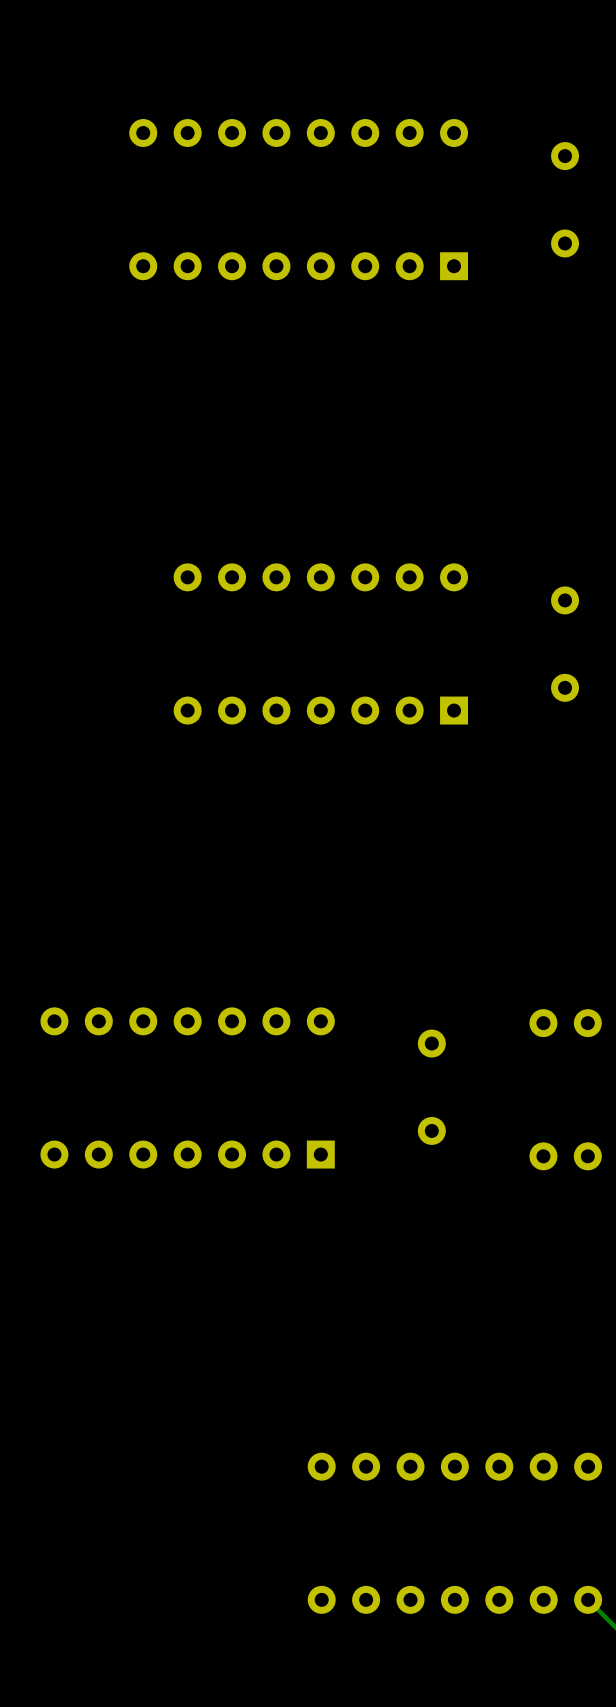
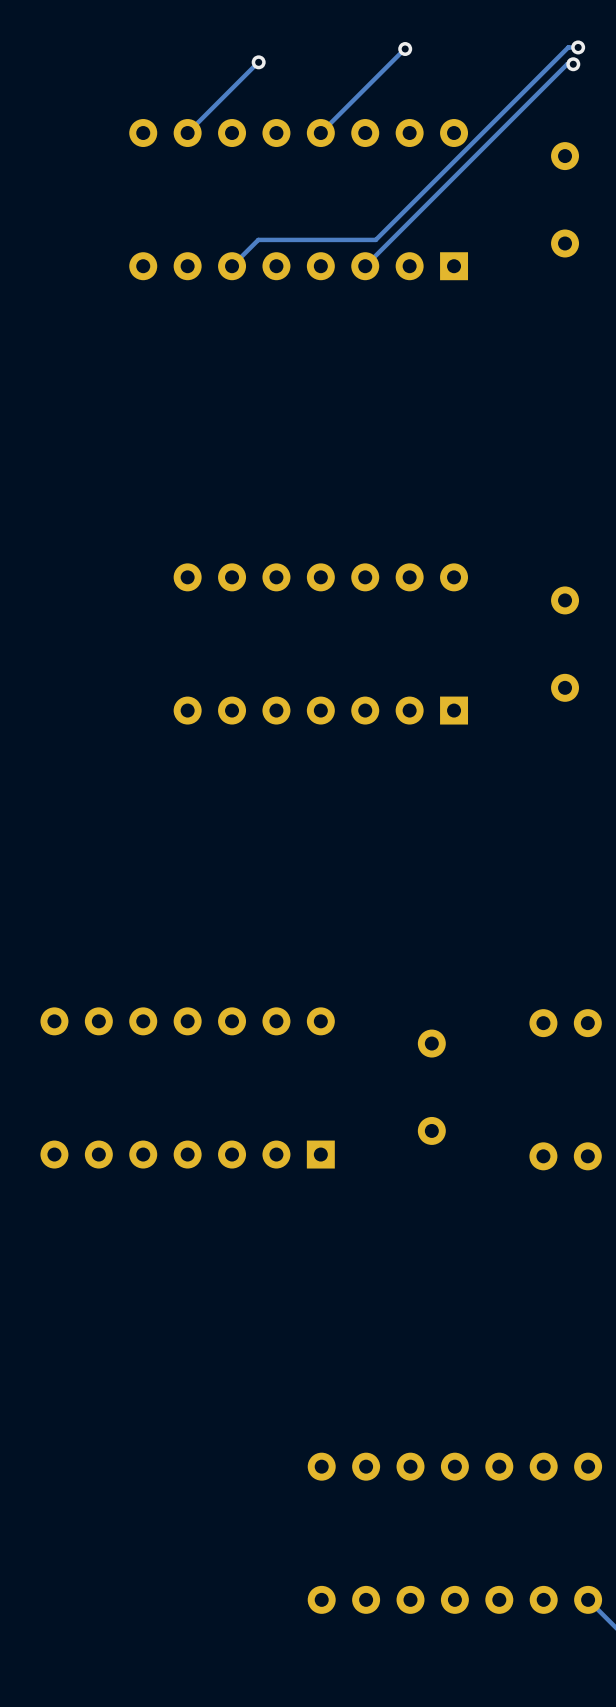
track: none -> (578, 47) (568, 47) (375, 239) (258, 239) (232, 266)
via: none -> (578, 47)
track: none -> (405, 49) (320, 133)
via: none -> (405, 49)
track: none -> (258, 62) (187, 133)
via: none -> (258, 62)
track: none -> (573, 64) (567, 64) (365, 266)
via: none -> (573, 64)

